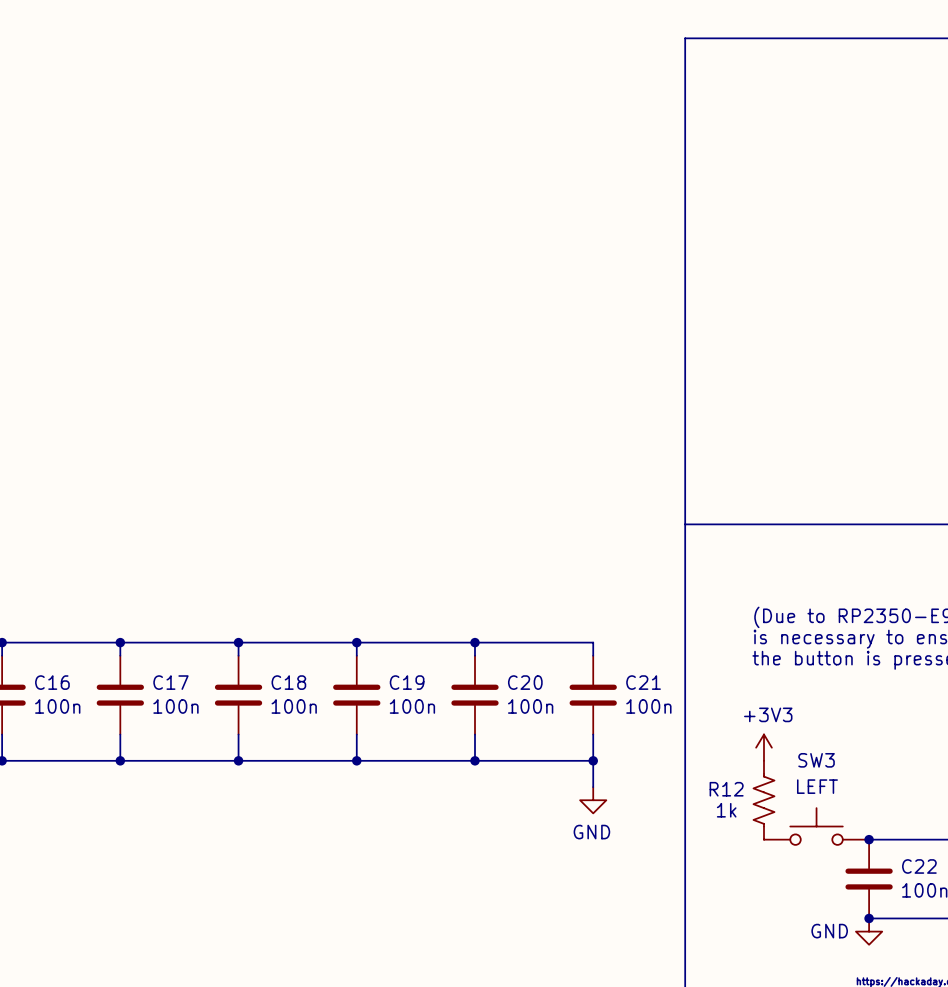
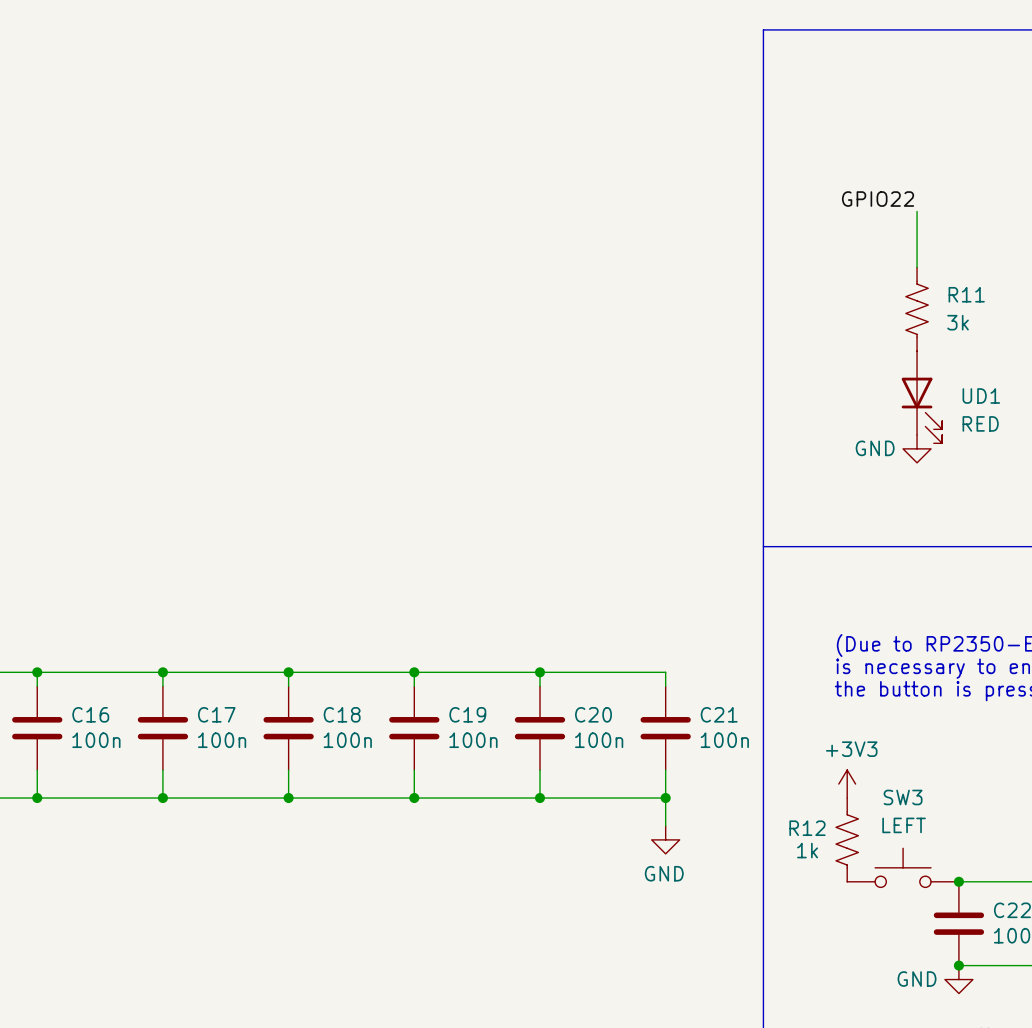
label: none -> GPIO22 (878, 199)
wire: none -> (917, 211) (917, 267)
R11: none -> 3k (917, 309)
UD1: none -> RED (921, 397)
power symbol: none -> GND (917, 448)

